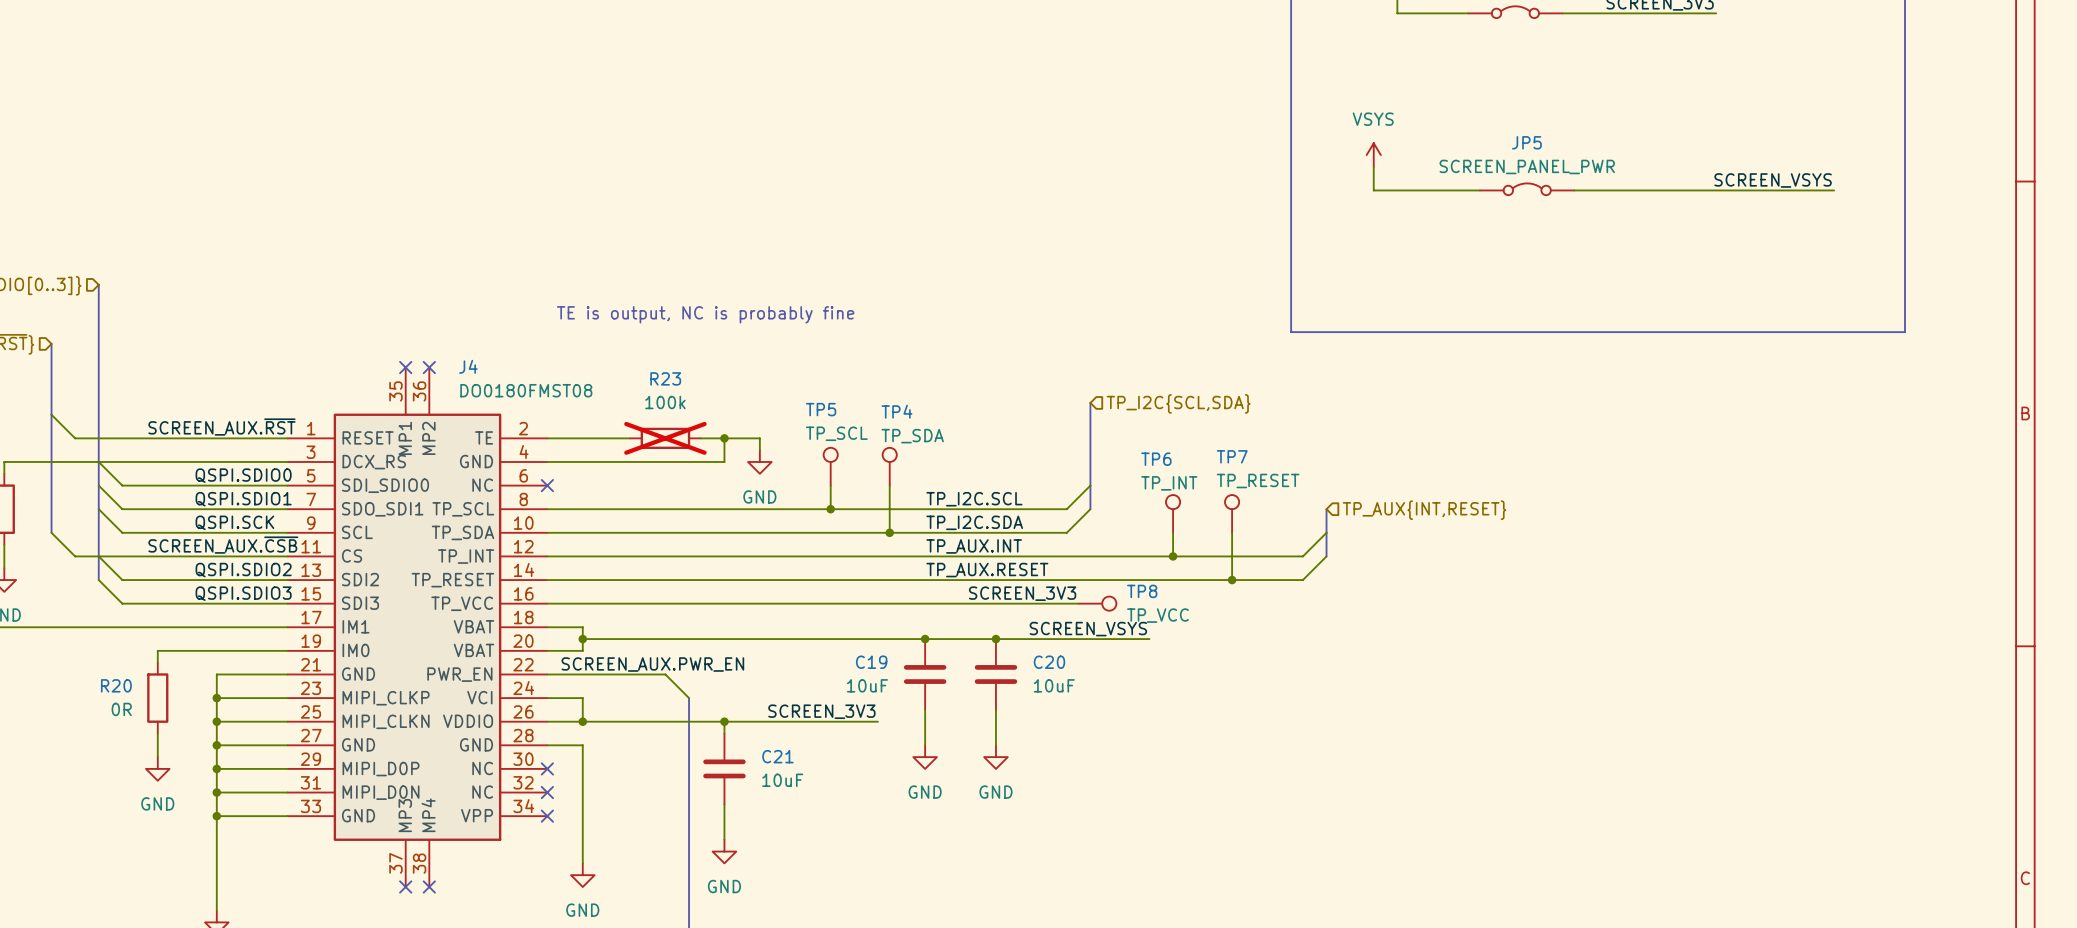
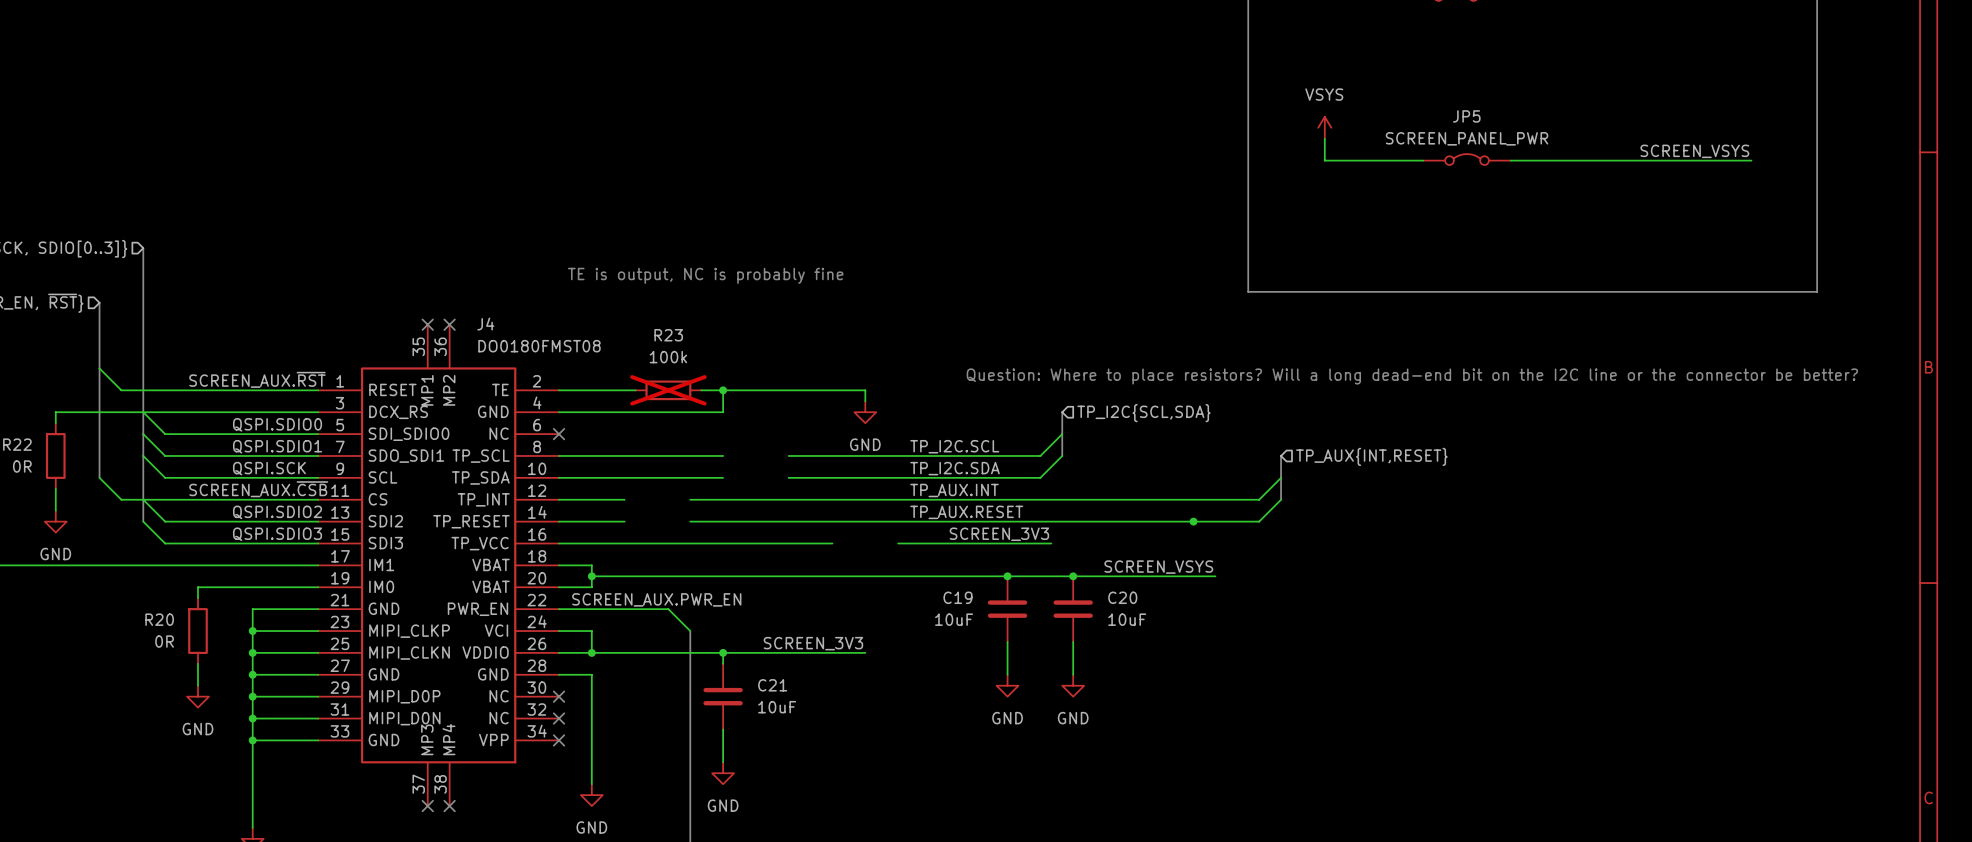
bus: (1090, 402) (1090, 461) -> none
hierarchical label position: TP_I2C{SCL,SDA} (1178, 403) -> TP_I2C{SCL,SDA} (1143, 413)
text: none -> Question: Where to place resistors? Will a long dead-end bit on the I2C line or the connector be better? (1412, 376)
wire: (759, 438) (759, 450) -> (755, 390) (865, 390) (865, 401)
power symbol position: GND (759, 461) -> GND (865, 412)
TP5: TP_SCL (830, 466) -> none
TP4: TP_SDA (889, 466) -> none
wire: (830, 485) (830, 509) -> none
wire: (889, 485) (889, 532) -> none
wire: (724, 509) (795, 509) -> none
junction: (830, 509) -> none
TP6: TP_INT (1173, 513) -> none
TP7: TP_RESET (1232, 513) -> none
wire: (724, 532) (795, 532) -> none
junction: (889, 532) -> none
wire: (1173, 532) (1173, 556) -> none
wire: (1232, 532) (1232, 580) -> none
wire: (618, 556) (689, 556) -> none
junction: (1173, 556) -> none
wire: (618, 580) (689, 580) -> none
wire: (842, 603) (913, 603) -> none
TP8: TP_VCC (1097, 603) -> none
label position: SCREEN_VSYS (1088, 629) -> SCREEN_VSYS (1158, 567)
junction: (925, 639) -> none
junction position: (995, 639) -> (1007, 576)
junction: none -> (1073, 576)
wire: none -> (1116, 576) (1215, 576)
C19 position: (925, 674) -> (1007, 609)
C20 position: (995, 674) -> (1073, 609)
wire: (925, 709) (925, 745) -> (1007, 641) (1007, 674)
wire: (995, 709) (995, 745) -> (1073, 641) (1073, 674)
power symbol: GND (925, 757) -> none
power symbol position: GND (995, 757) -> GND (1007, 685)
power symbol: none -> GND (1073, 685)

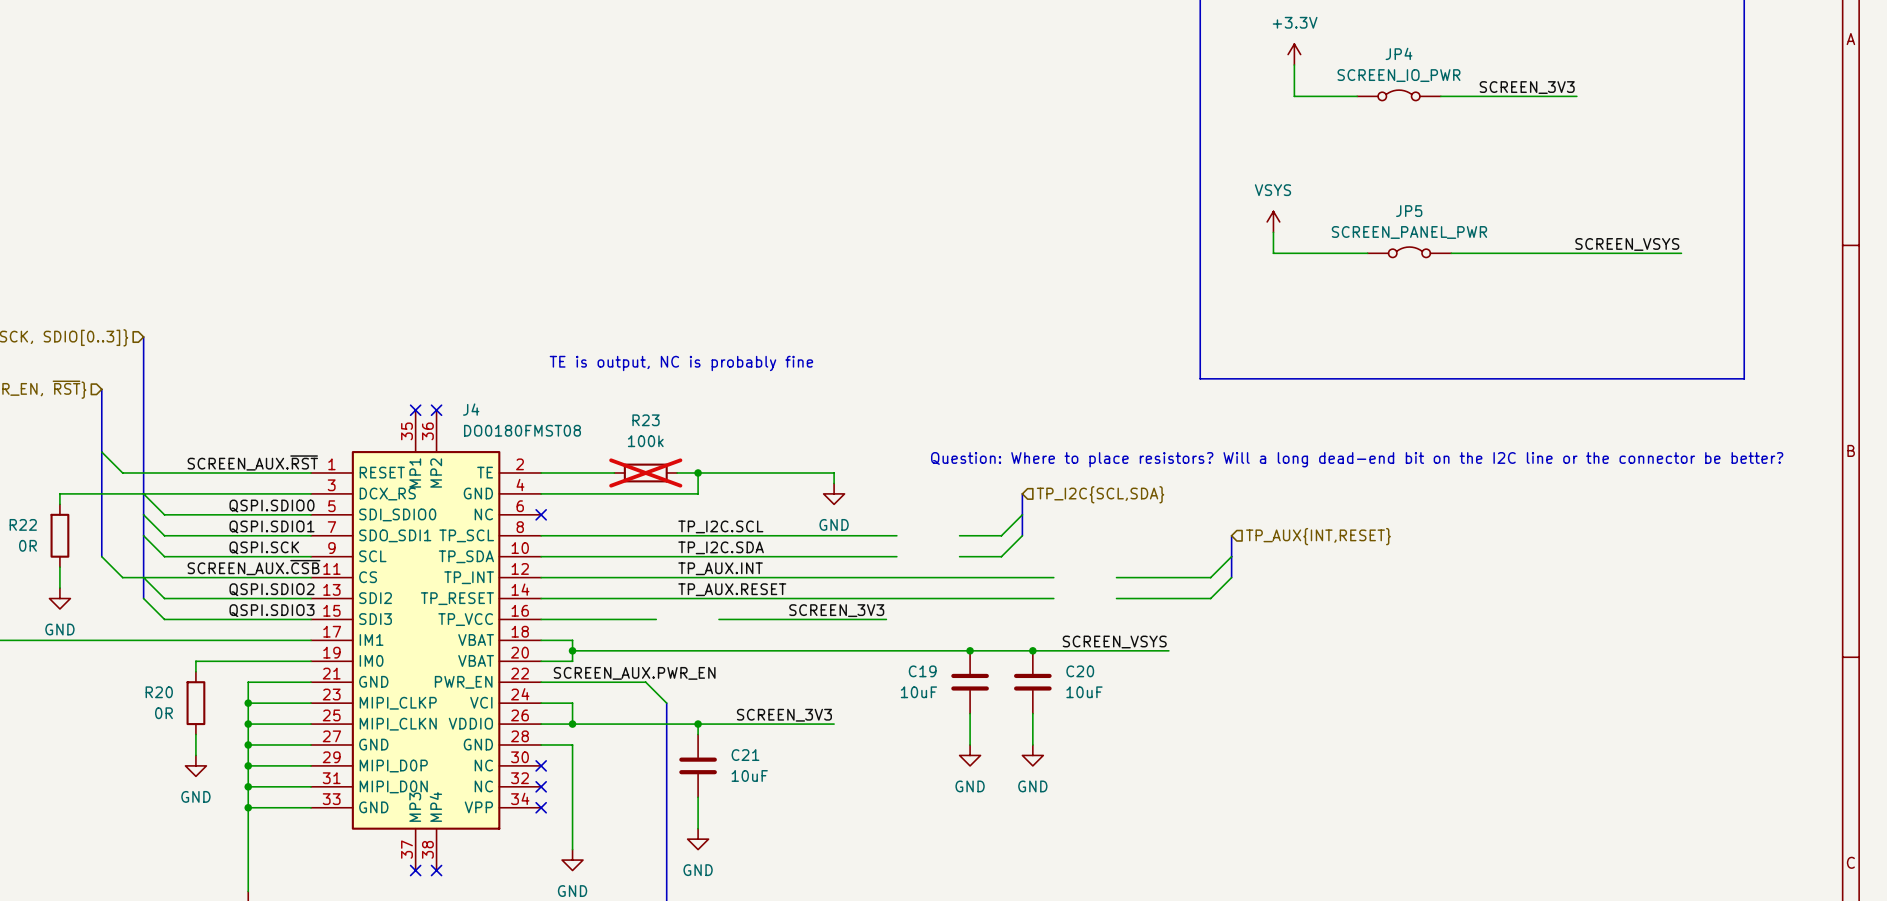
label position: TP_I2C.SCL (954, 446) -> TP_I2C.SCL (720, 526)
wire: (930, 455) (996, 455) -> (698, 535) (760, 535)
label position: TP_I2C.SDA (955, 468) -> TP_I2C.SDA (721, 547)
wire: (930, 477) (996, 477) -> (698, 556) (760, 556)
label position: TP_AUX.INT (954, 490) -> TP_AUX.INT (720, 568)
wire: none -> (603, 577) (666, 577)
wire: (1095, 499) (1160, 499) -> none
label position: TP_AUX.RESET (966, 512) -> TP_AUX.RESET (732, 589)
wire: (1095, 521) (1160, 521) -> none
junction: (1193, 521) -> none
label position: SCREEN_3V3 (999, 534) -> SCREEN_3V3 (836, 610)
wire: (679, 543) (744, 543) -> (603, 598) (666, 598)
wire: none -> (802, 619) (865, 619)
wire: (920, 543) (1051, 543) -> none

